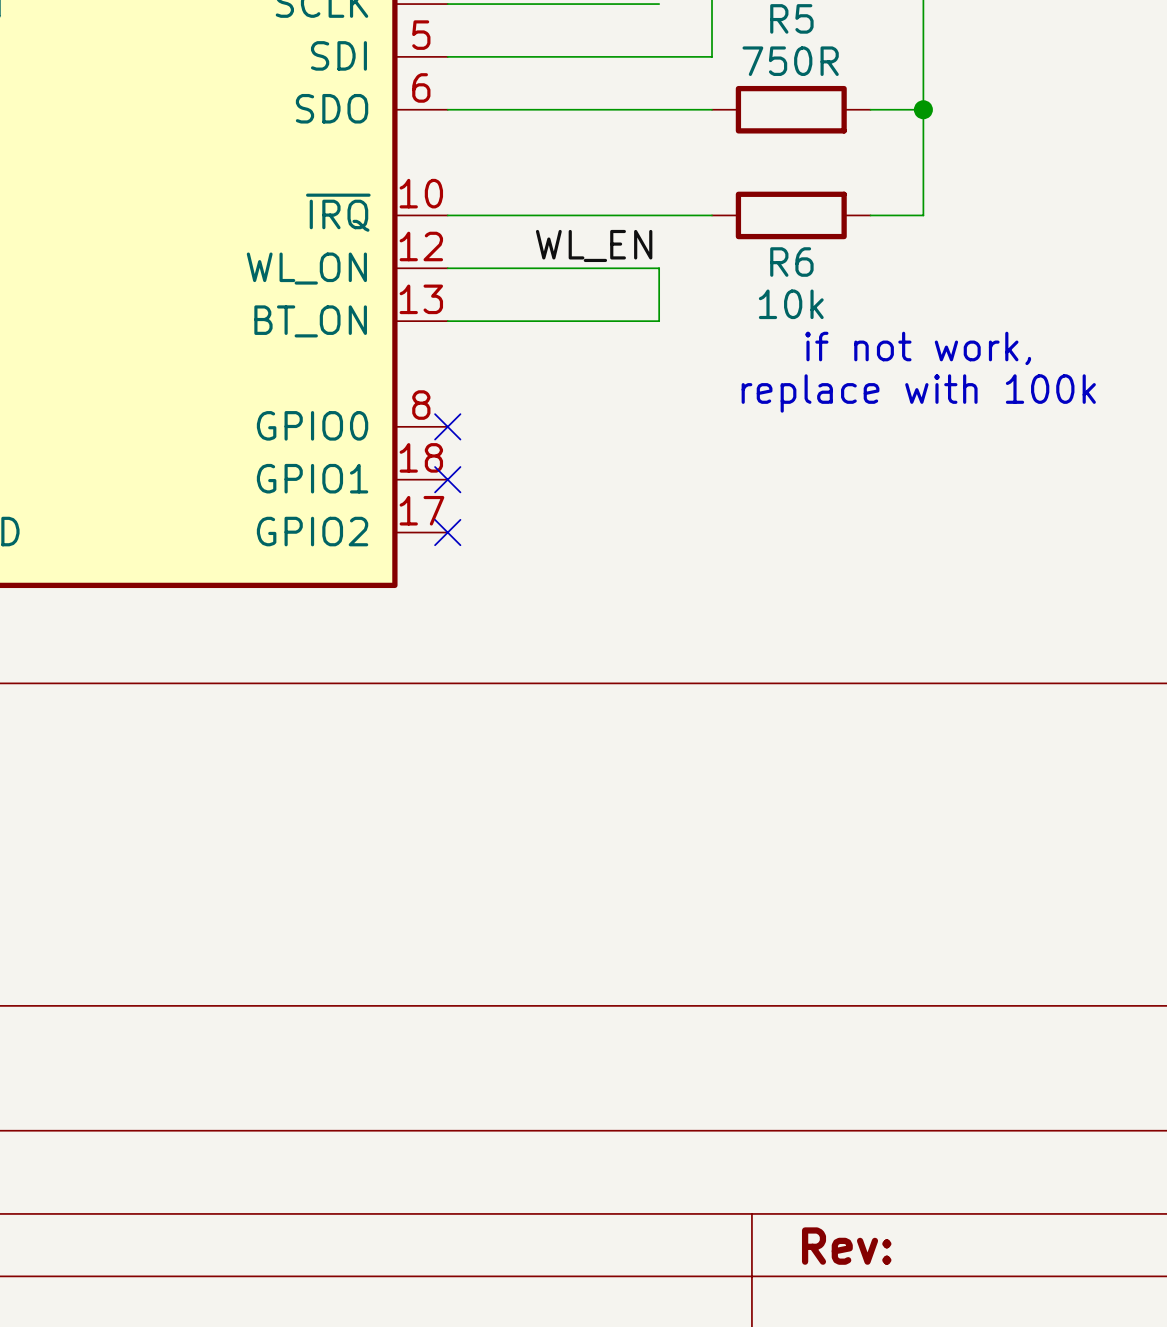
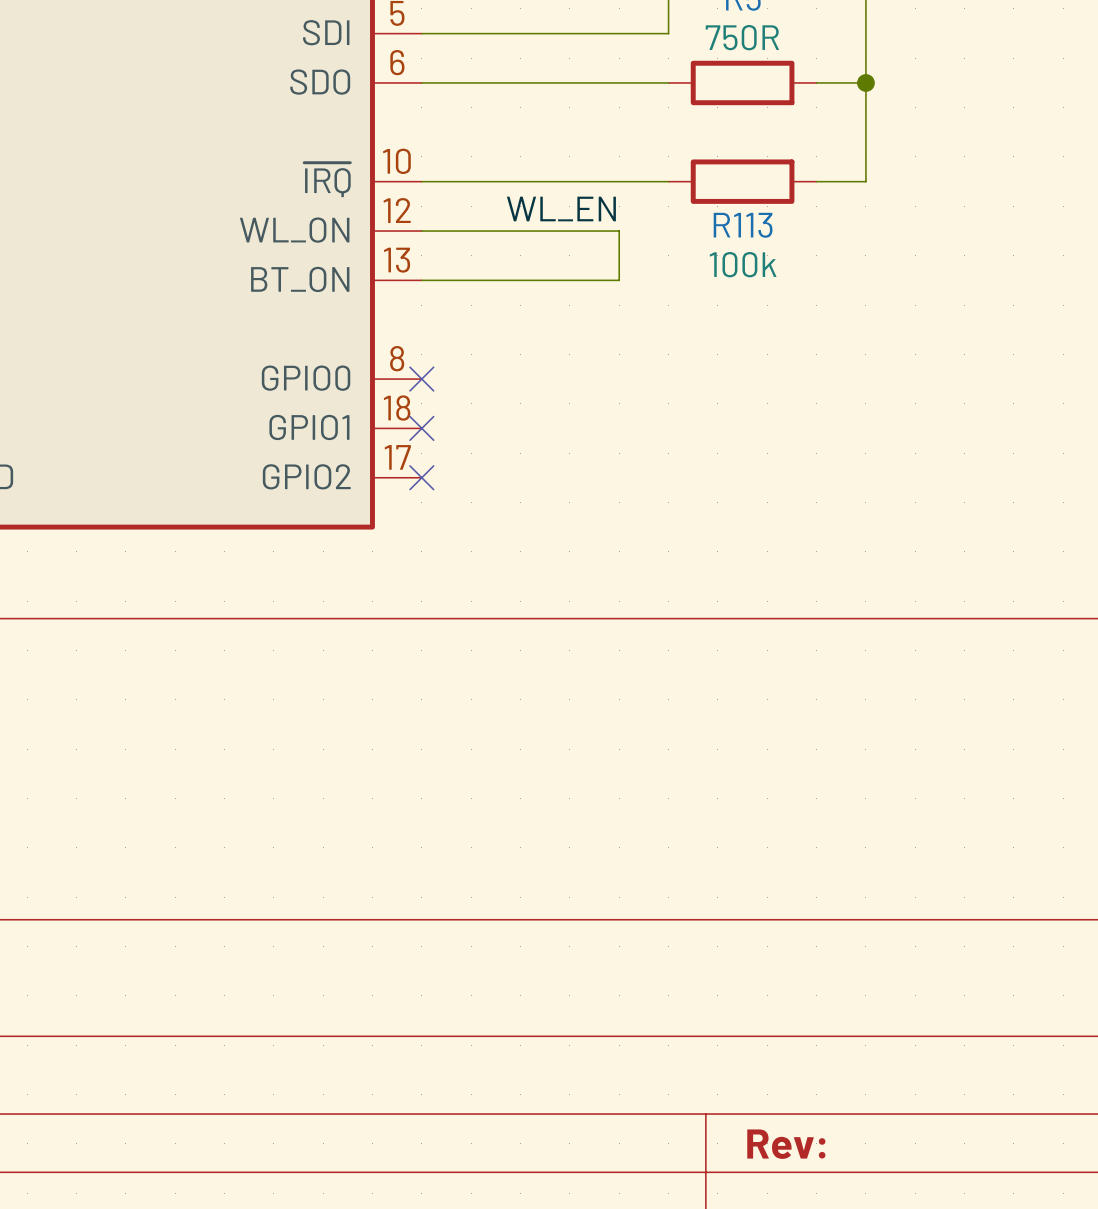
R6 name: R6 (791, 262) -> R113 (743, 225)
R6 value: 10k (791, 304) -> 100k (743, 264)
text: if not work, (918, 348) -> none
text: replace with 100k (918, 393) -> none

